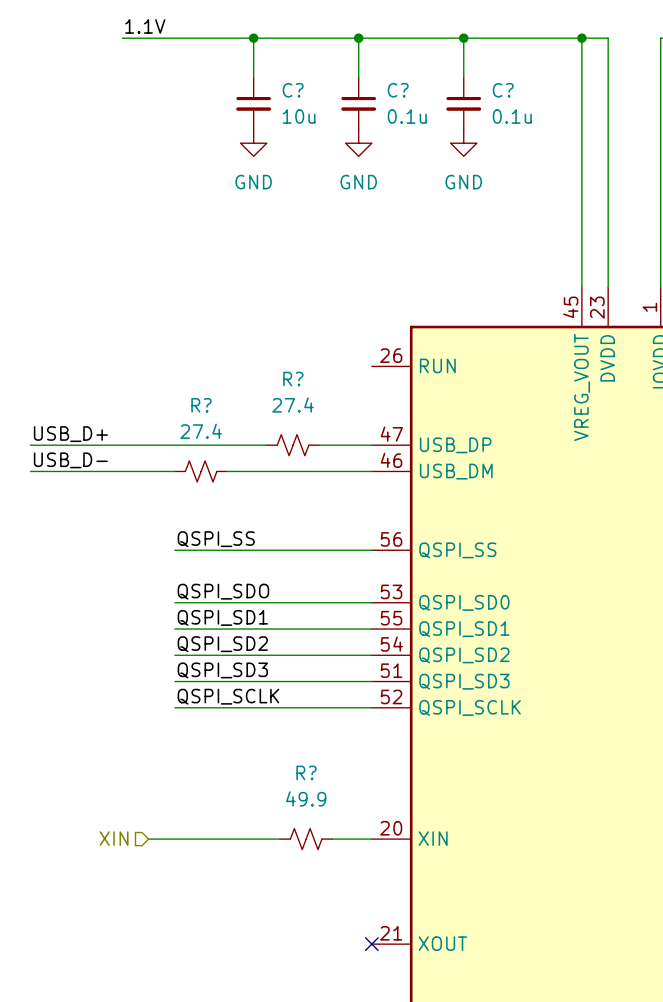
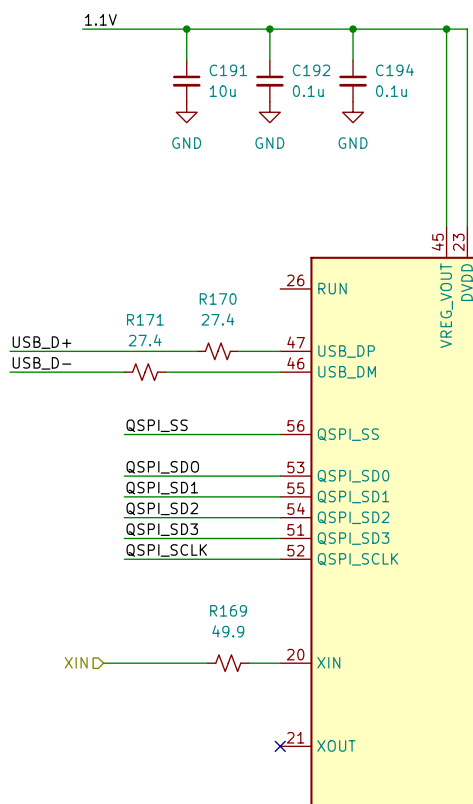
C? name: C? (293, 90) -> C191 (228, 70)
C? name: C? (398, 90) -> C192 (311, 70)
C? name: C? (503, 90) -> C194 (394, 70)
R? name: R? (293, 379) -> R170 (218, 299)
R? name: R? (201, 405) -> R171 (145, 319)
R? name: R? (306, 772) -> R169 (228, 610)

